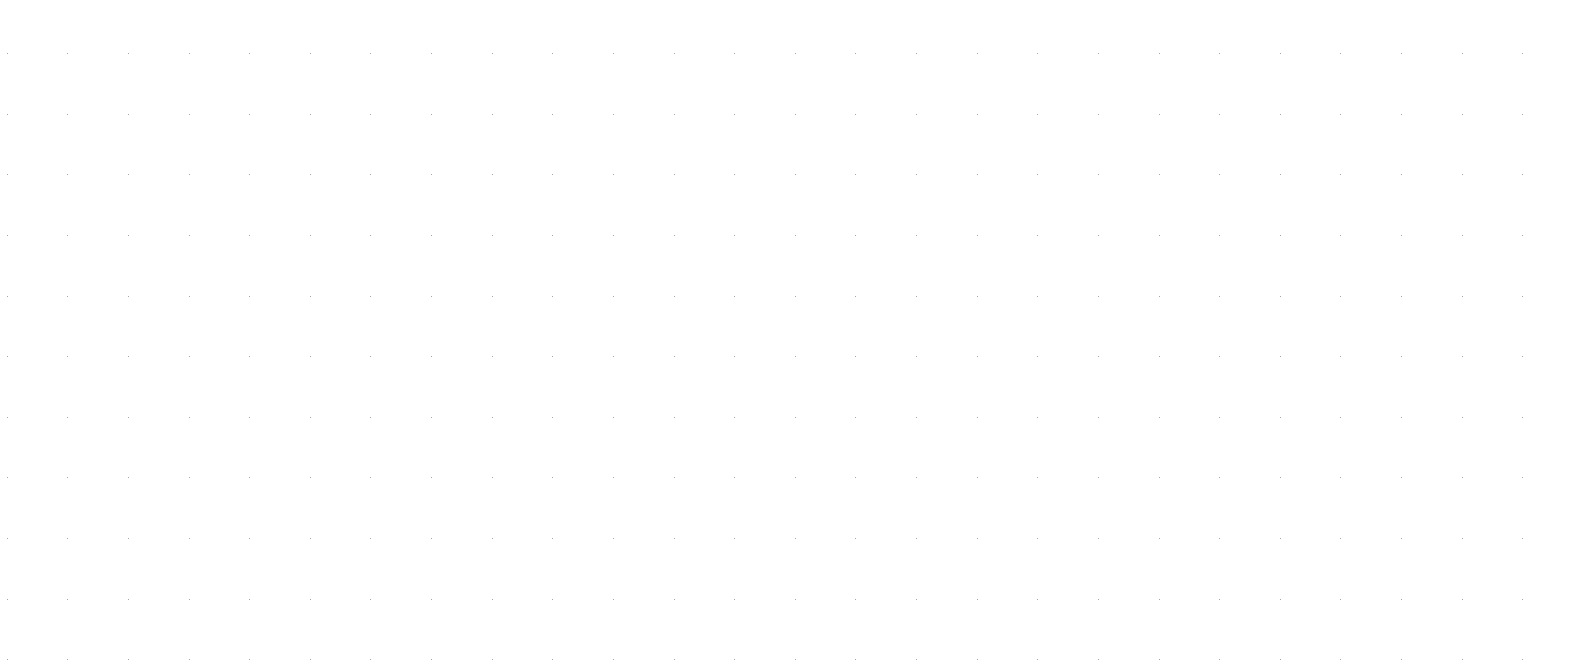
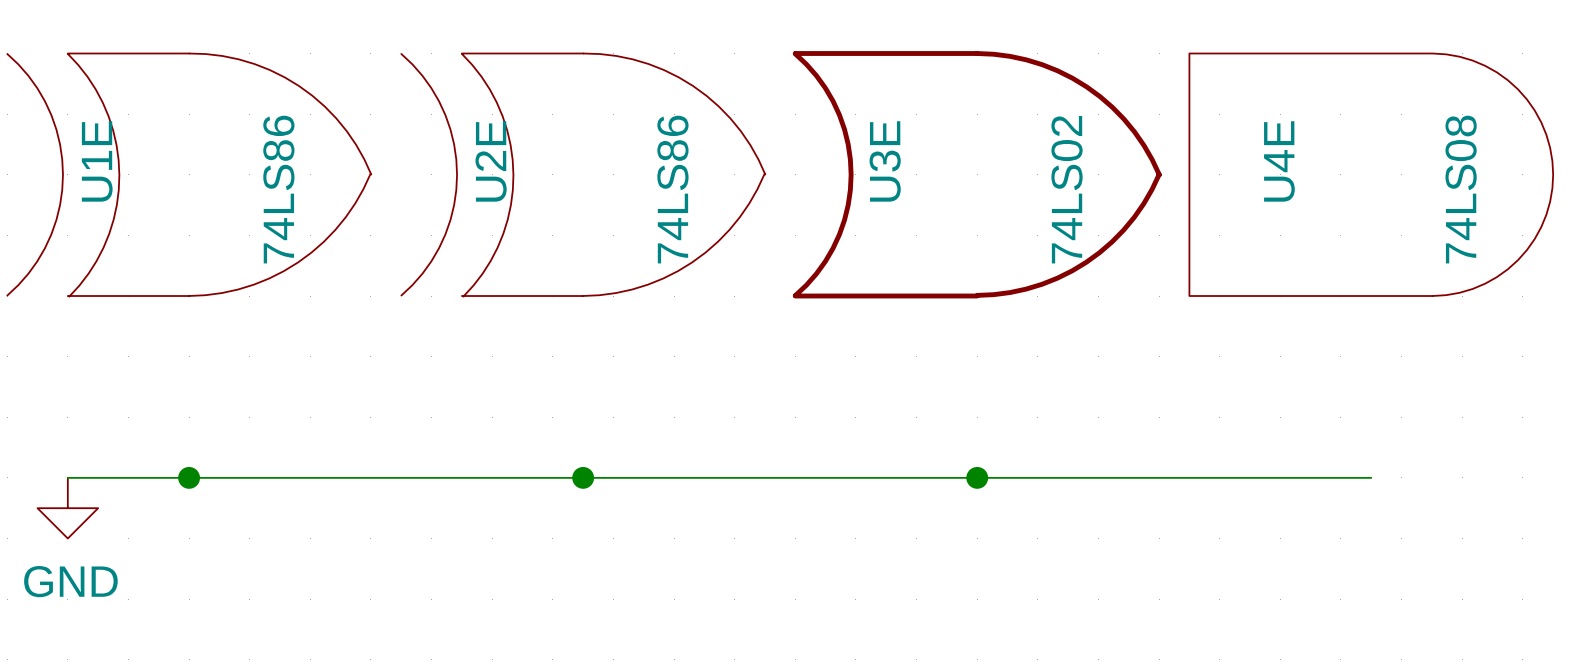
U3E: none -> 74LS02 (977, 174)
U4E: none -> 74LS08 (1371, 174)
U1E: none -> 74LS86 (189, 175)
U2E: none -> 74LS86 (583, 175)
wire: none -> (67, 477) (1371, 477)
junction: none -> (189, 477)
junction: none -> (583, 477)
junction: none -> (977, 477)
power symbol: none -> GND (67, 508)

